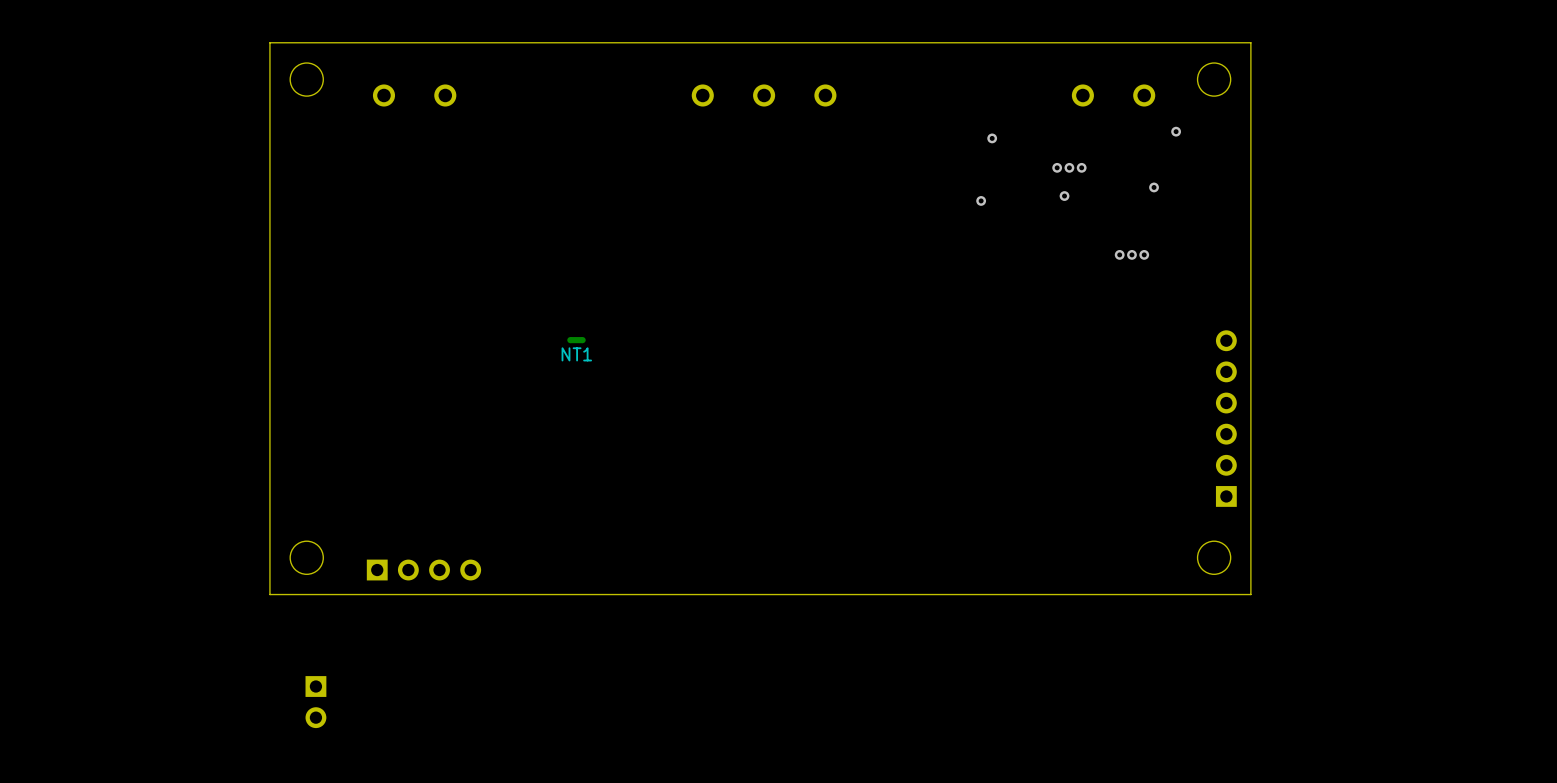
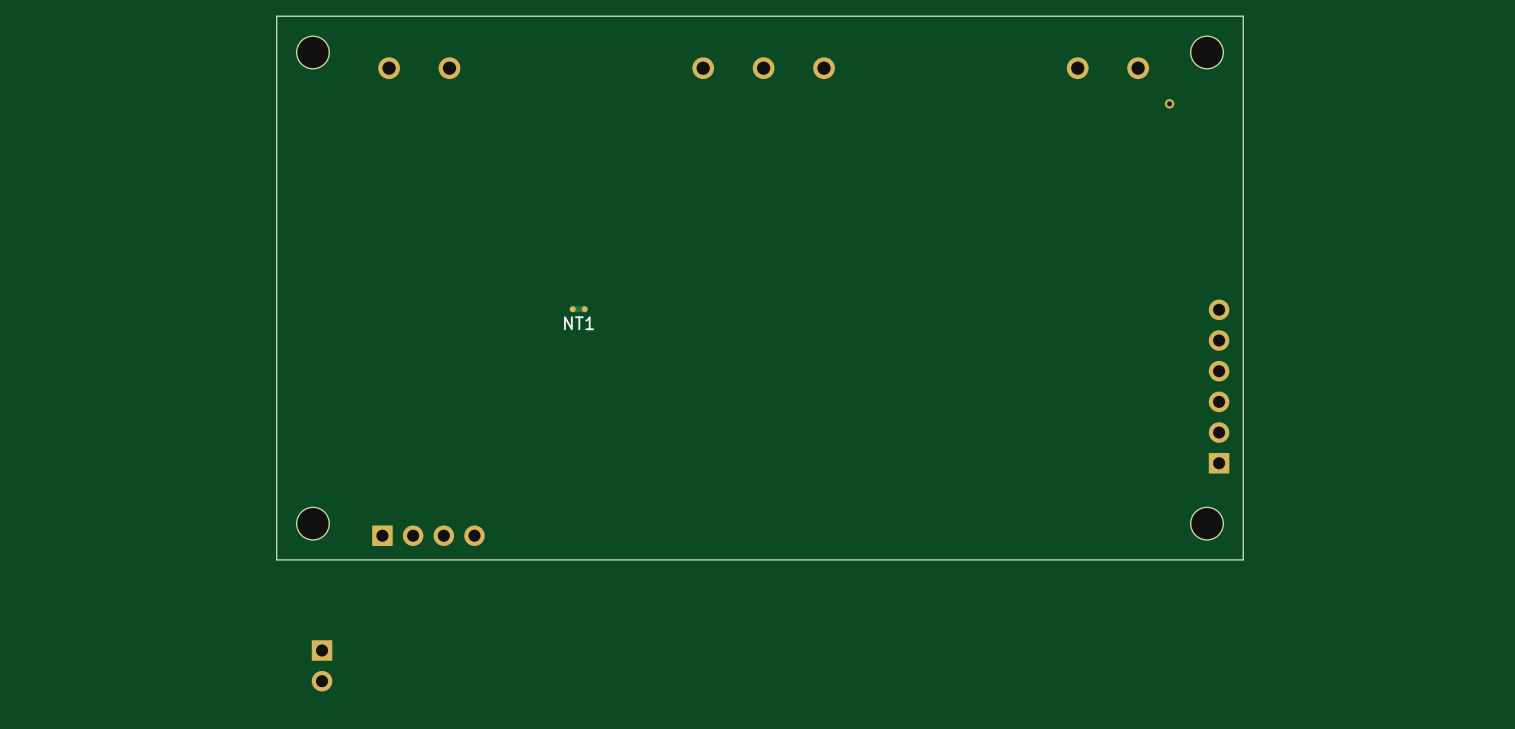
via: (992, 138) -> none
via: (1057, 167) -> none
via: (1069, 167) -> none
via: (1081, 167) -> none
via: (1154, 187) -> none
via: (1064, 196) -> none
via: (981, 200) -> none
via: (1119, 254) -> none
via: (1131, 254) -> none
via: (1144, 254) -> none

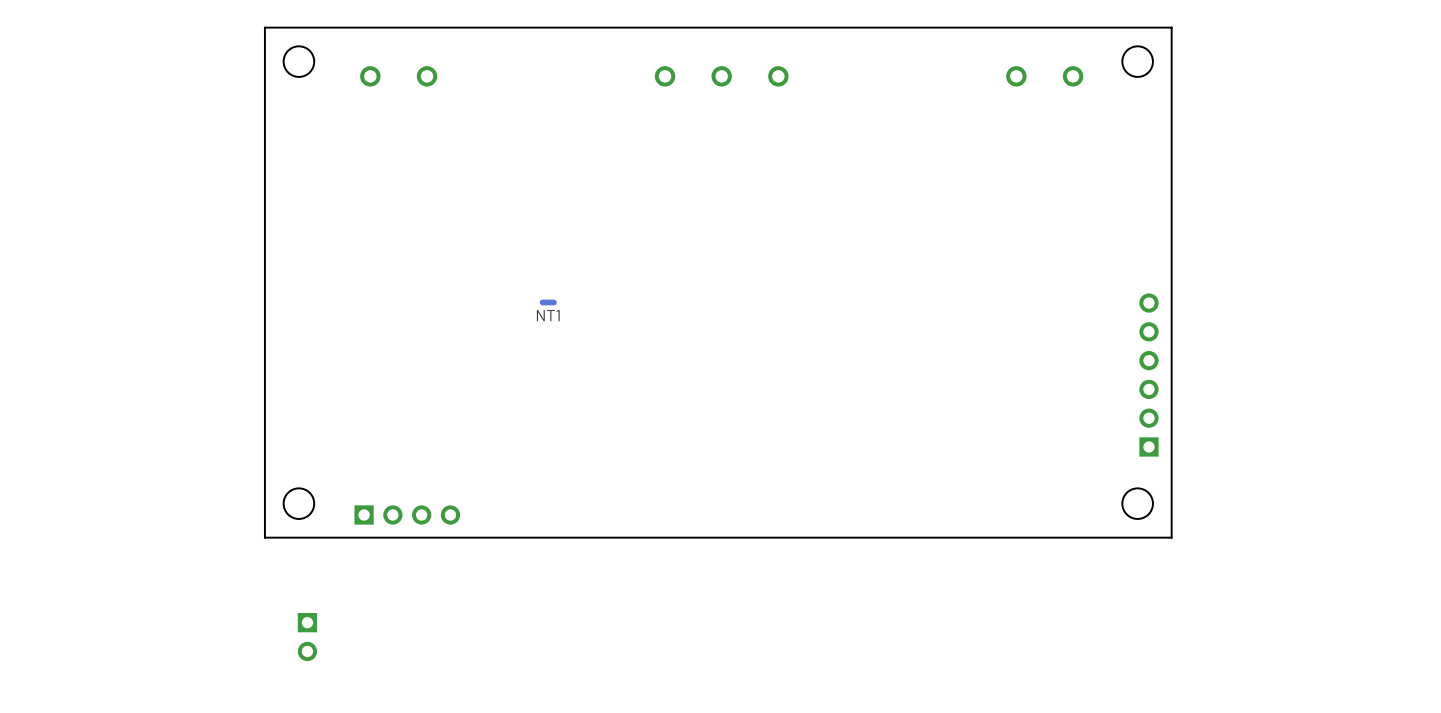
via: (1169, 103) -> none

